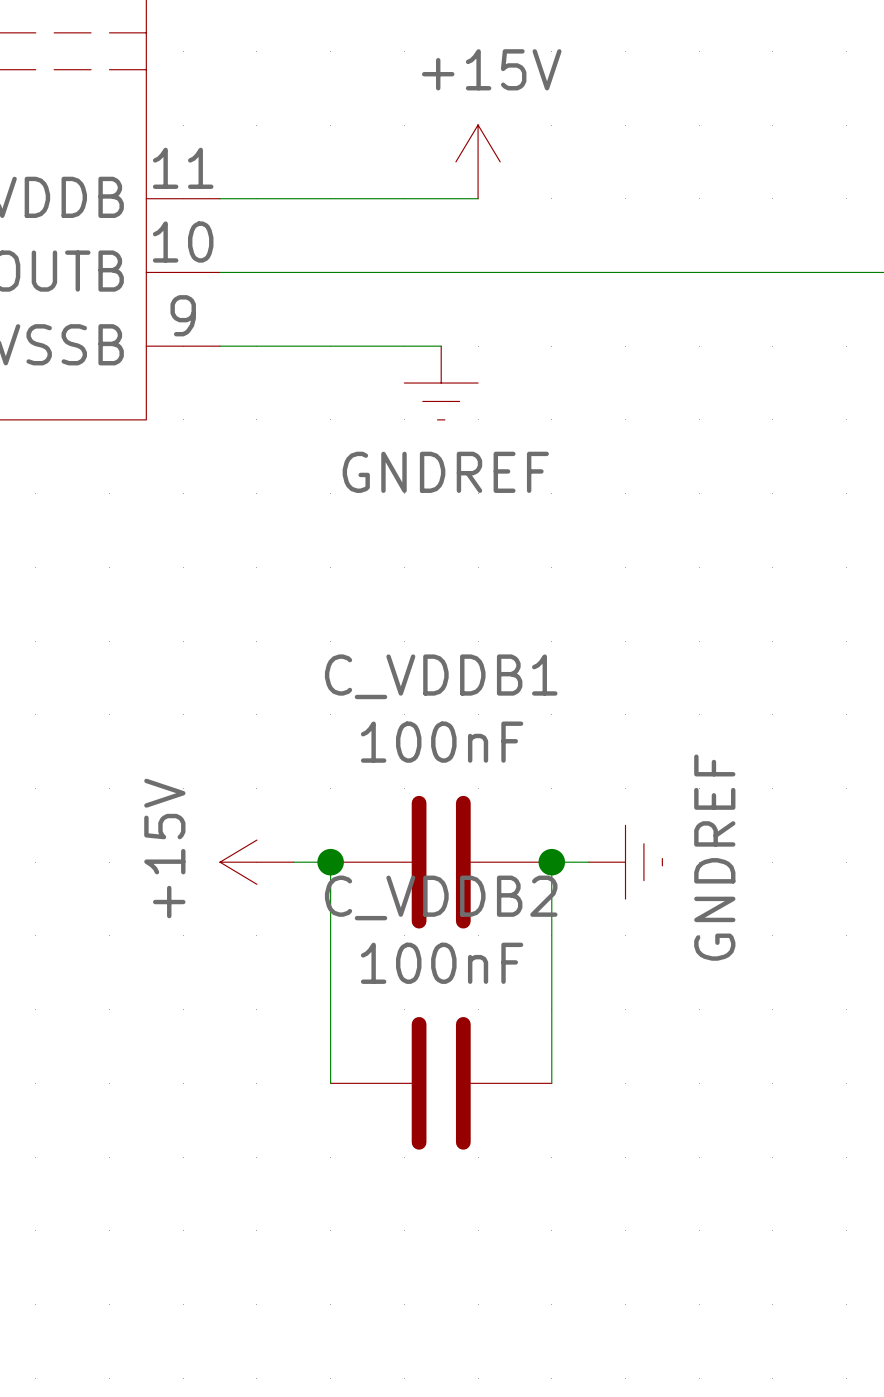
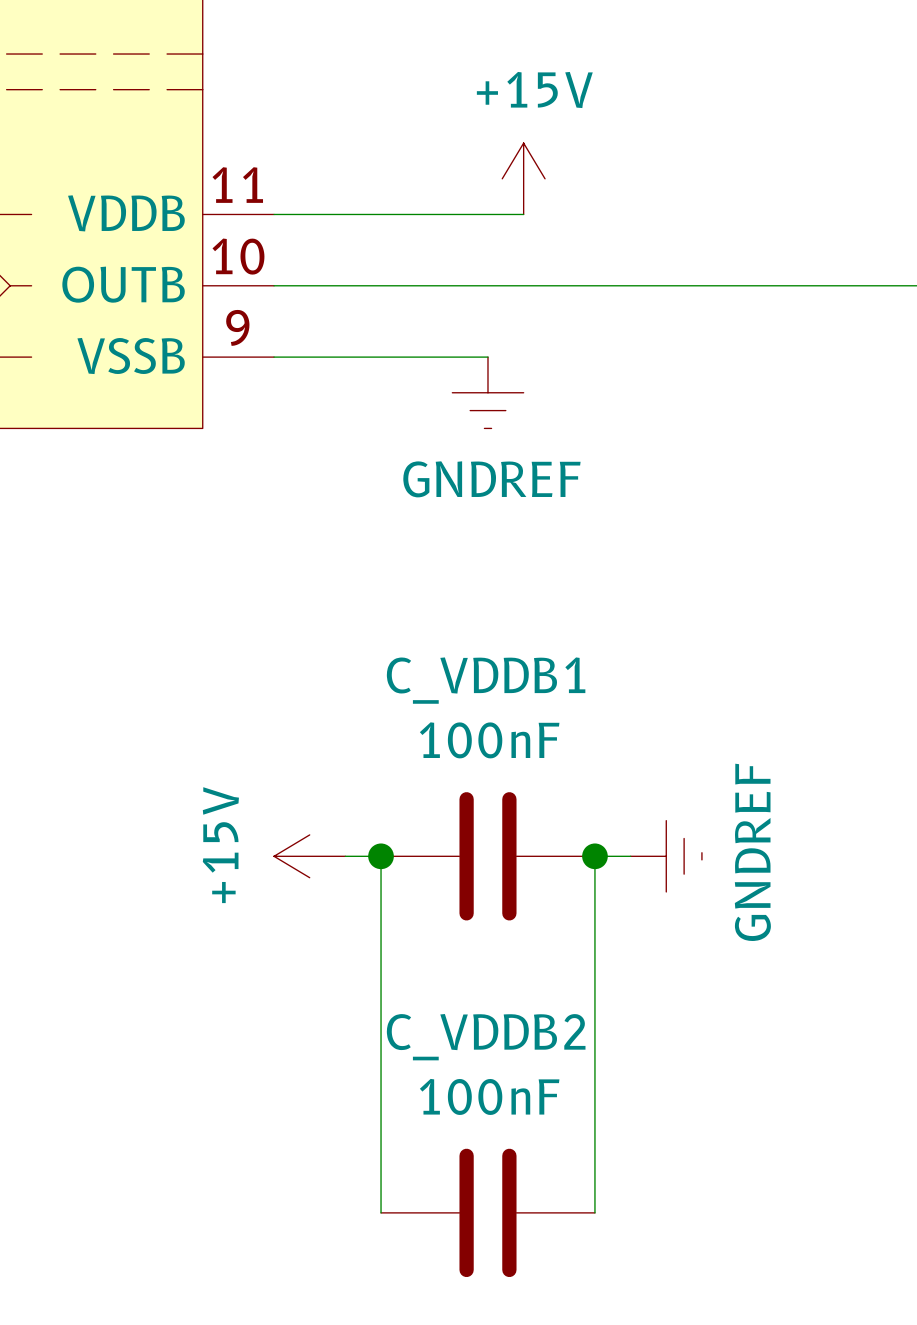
wire: none -> (381, 1070) (381, 1212)
C_VDDB2 position: (441, 1083) -> (487, 1212)
wire: none -> (594, 1070) (594, 1212)

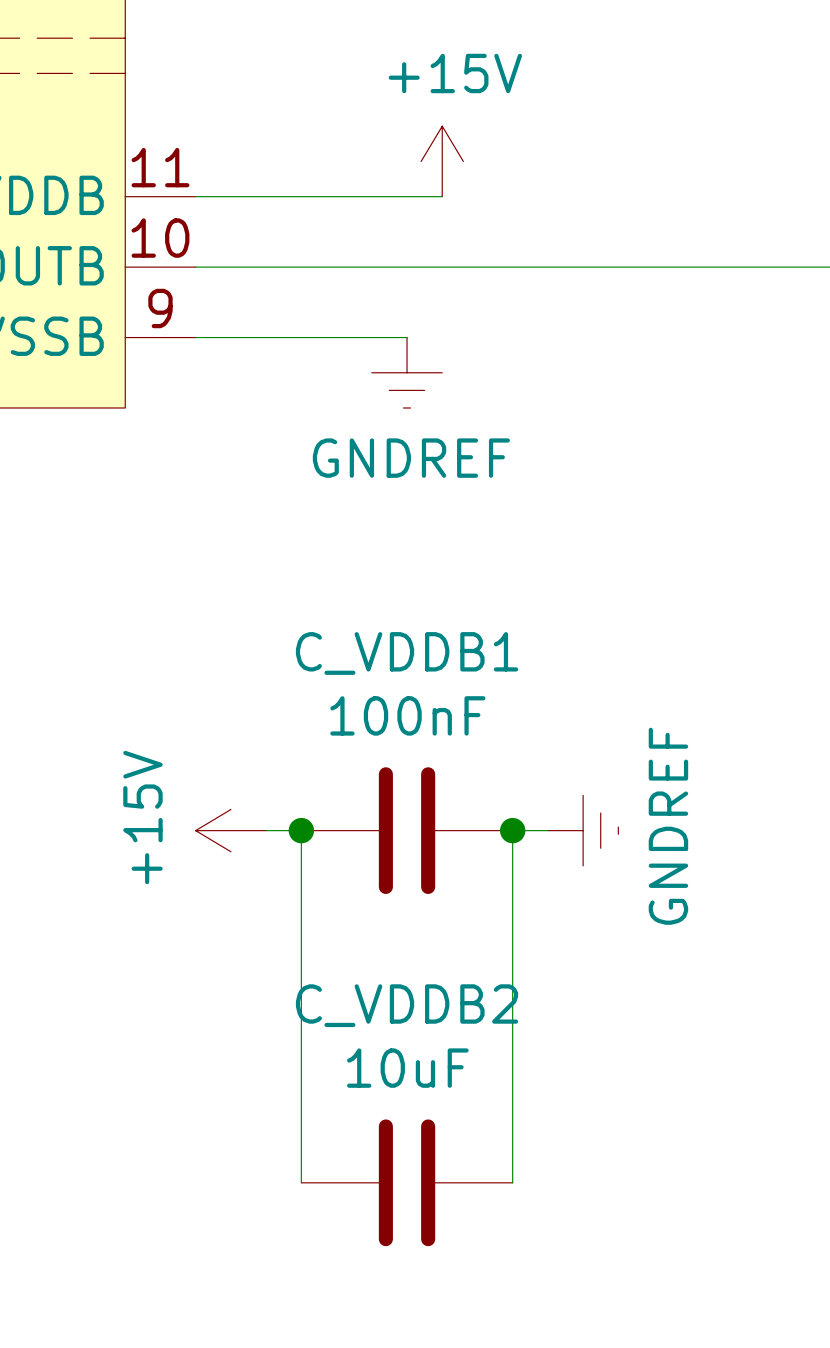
C_VDDB2 value: 100nF (489, 1096) -> 10uF (407, 1068)

